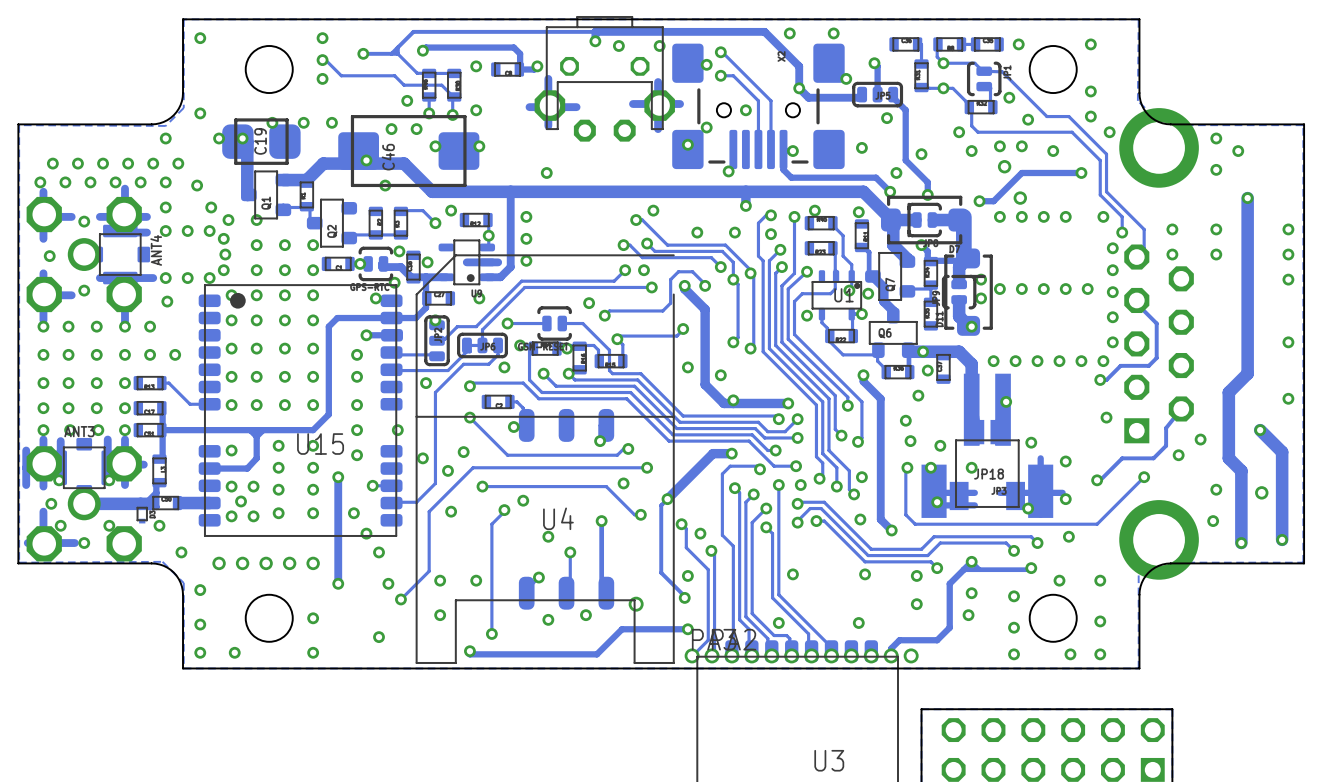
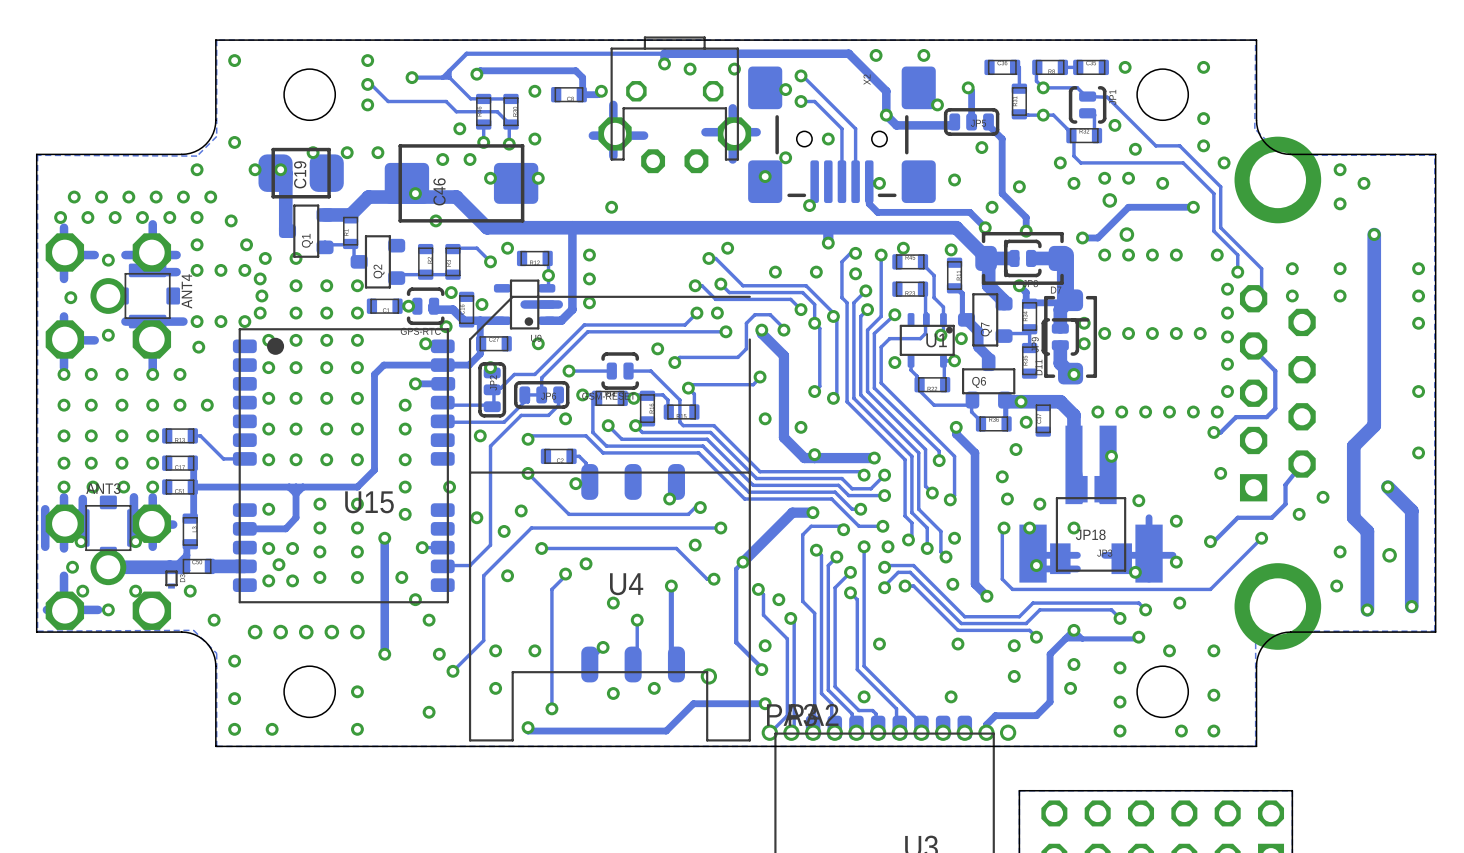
track: none -> (493, 391) (493, 405)

